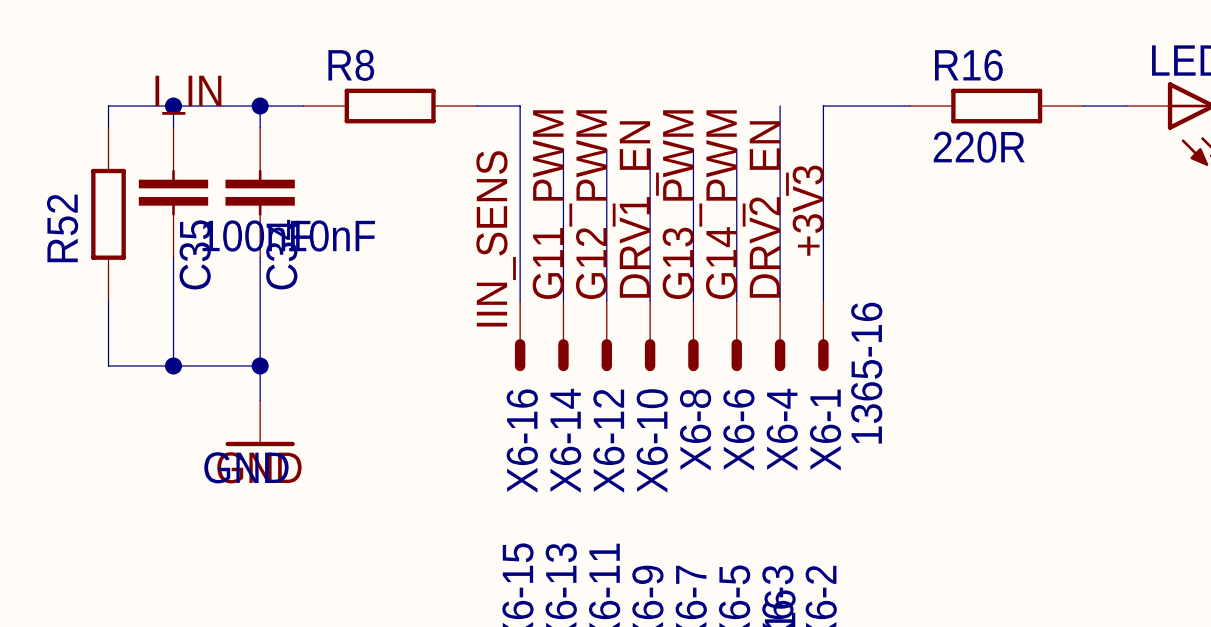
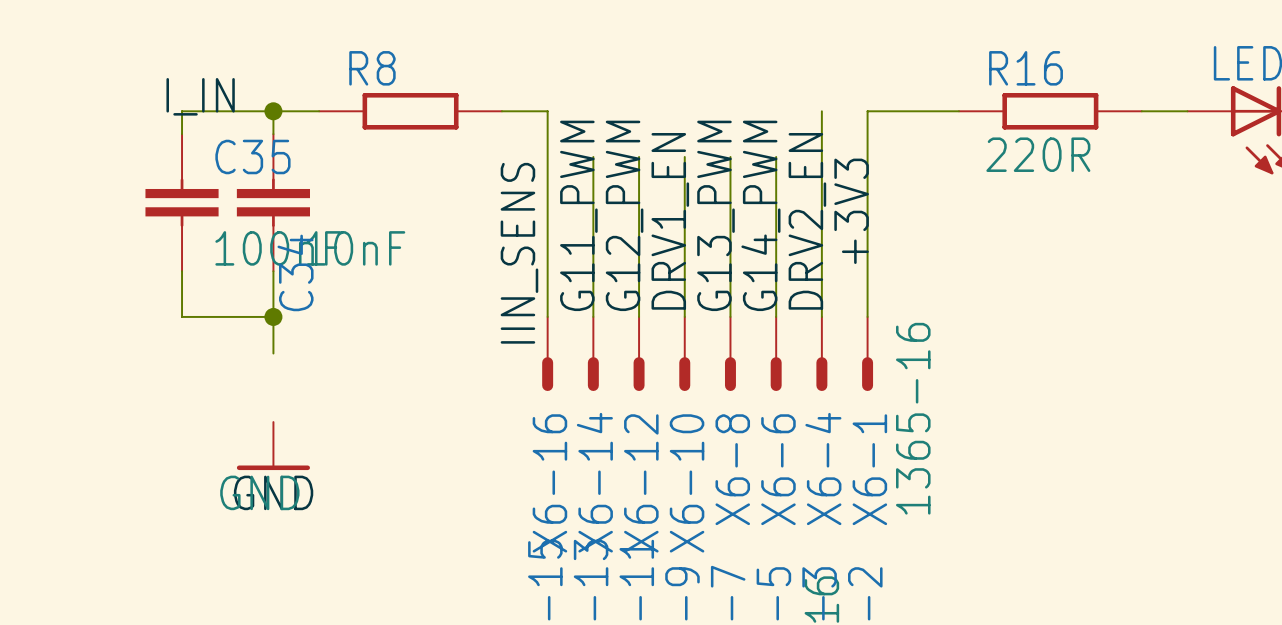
wire: (173, 106) (108, 106) (108, 127) -> none
junction: (173, 106) -> none
R52: (108, 214) -> none
C35 name rotation: 0° (195, 254) -> 90° clockwise (252, 156)
C35 name position: C35 (195, 254) -> C35 (252, 156)
wire: (108, 301) (108, 365) (260, 365) -> none
wire: (173, 301) (173, 365) -> (182, 316) (273, 316)
junction: none -> (273, 316)
wire: (260, 335) (260, 400) -> none
junction: (173, 365) -> none
junction: (260, 365) -> none

